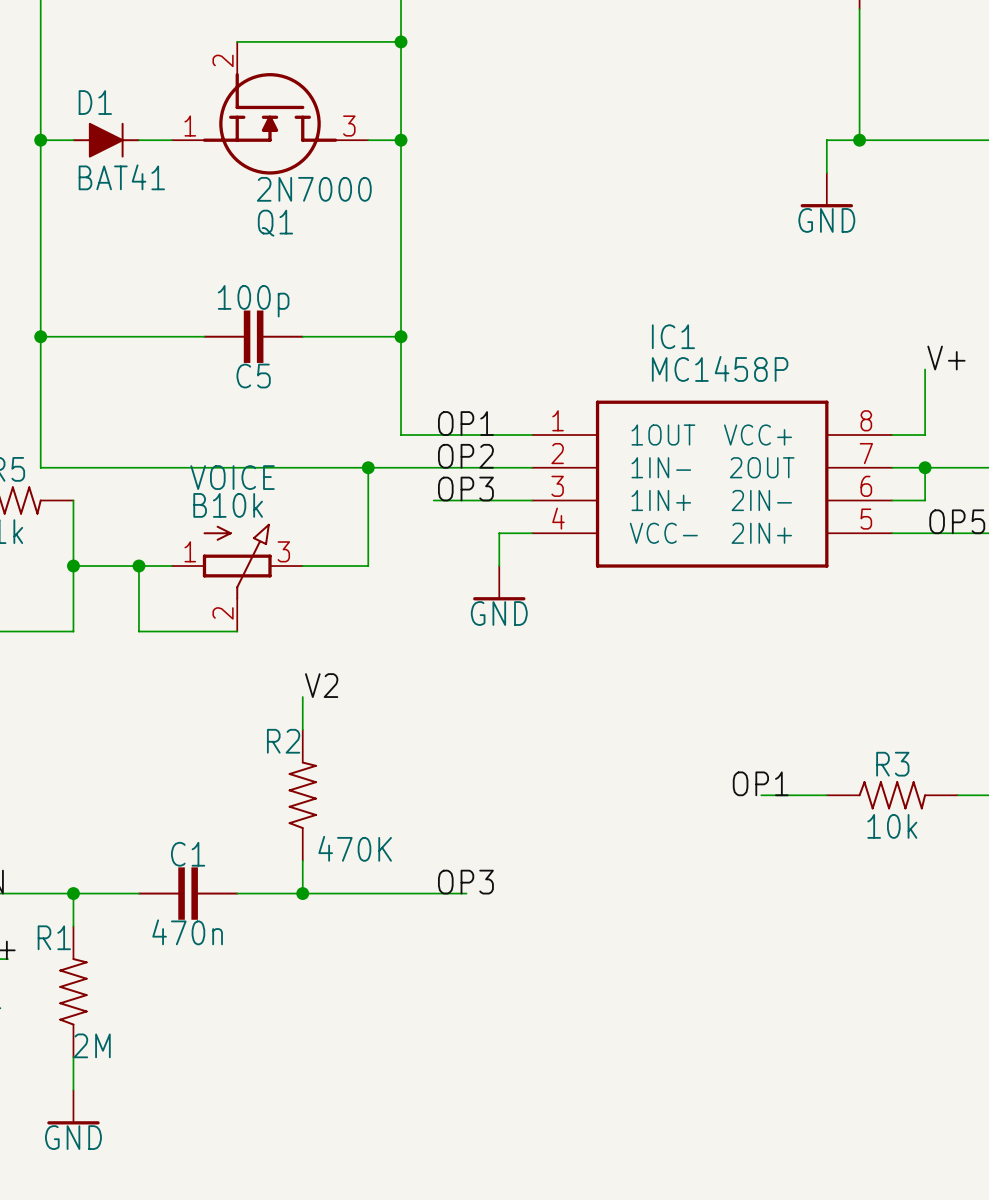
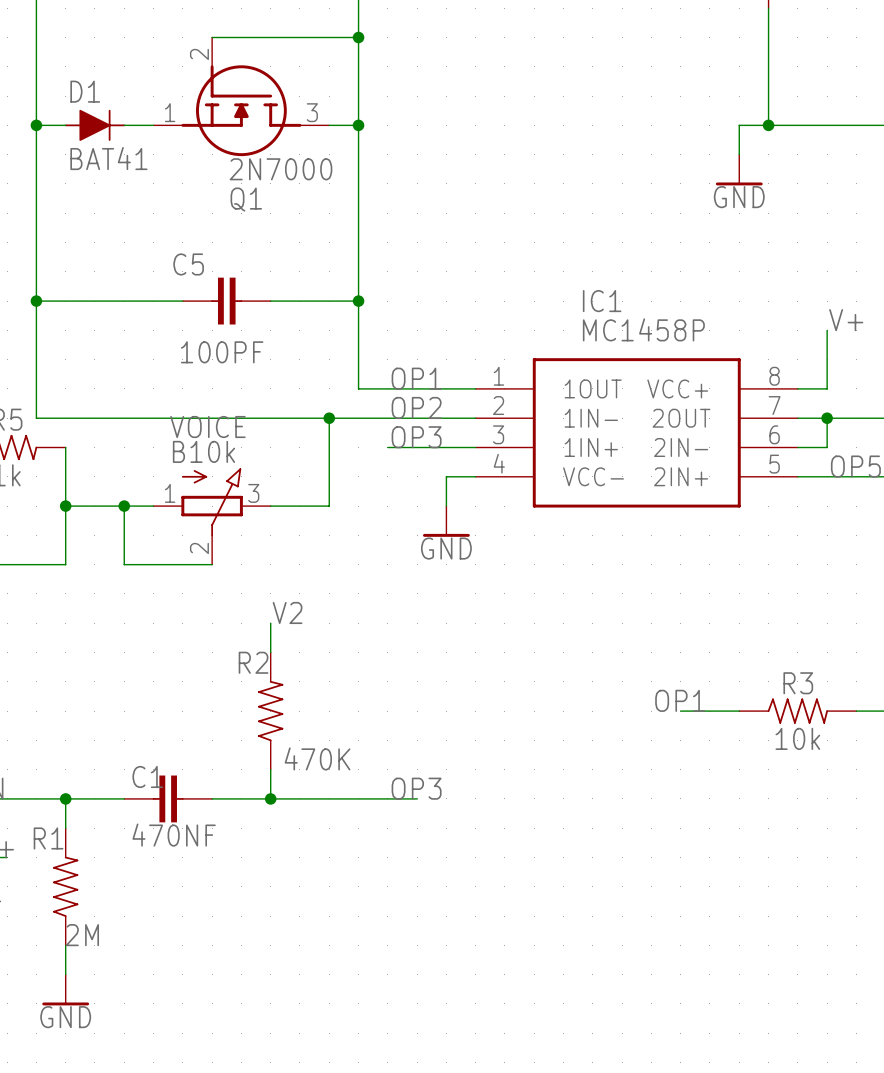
C5 value: 100p (253, 301) -> 100PF (222, 352)
C5 symbol: [203, 310, 304, 363] -> [182, 277, 271, 325]
C5 name position: C5 (253, 376) -> C5 (188, 264)
C1 symbol: [137, 867, 239, 920] -> [124, 775, 213, 823]
C1 value: 470n (187, 932) -> 470NF (174, 835)

